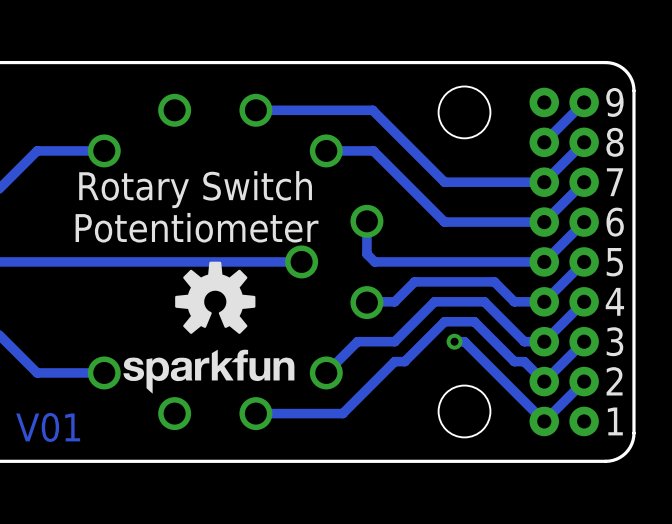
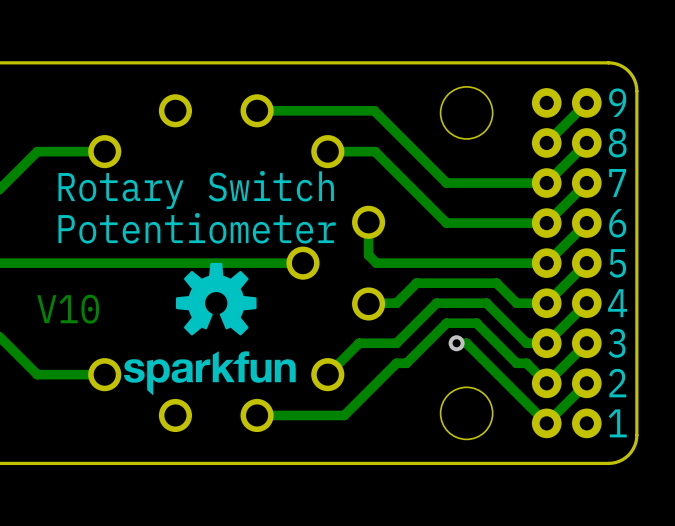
text: none -> V10 (68, 309)
text: V01 (48, 427) -> none

